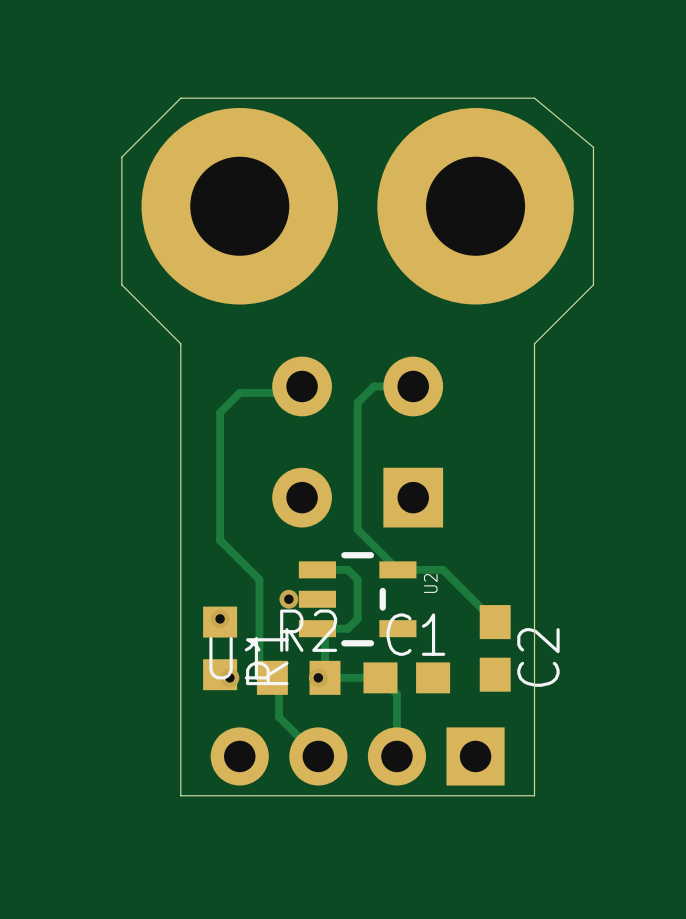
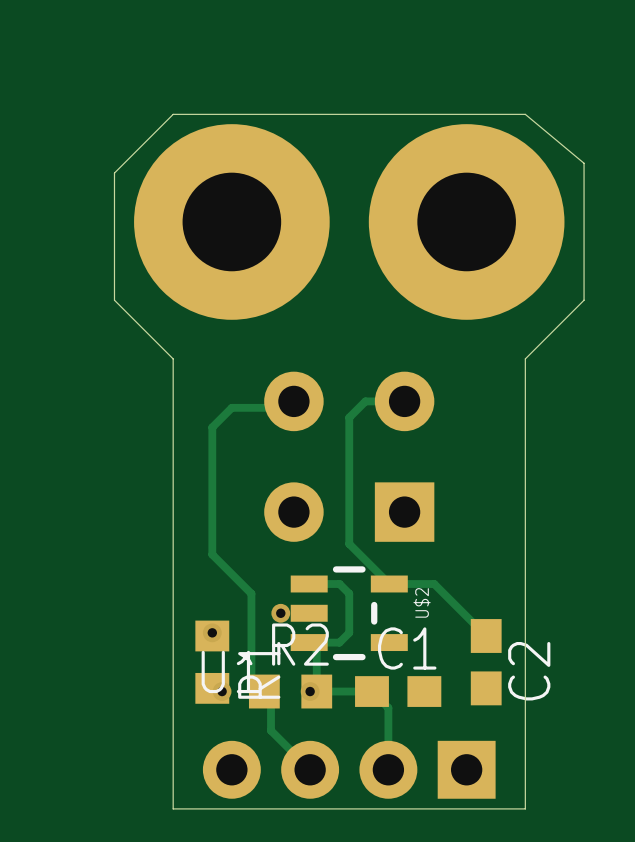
U2 name: U2 (430, 583) -> U$2 (422, 602)

